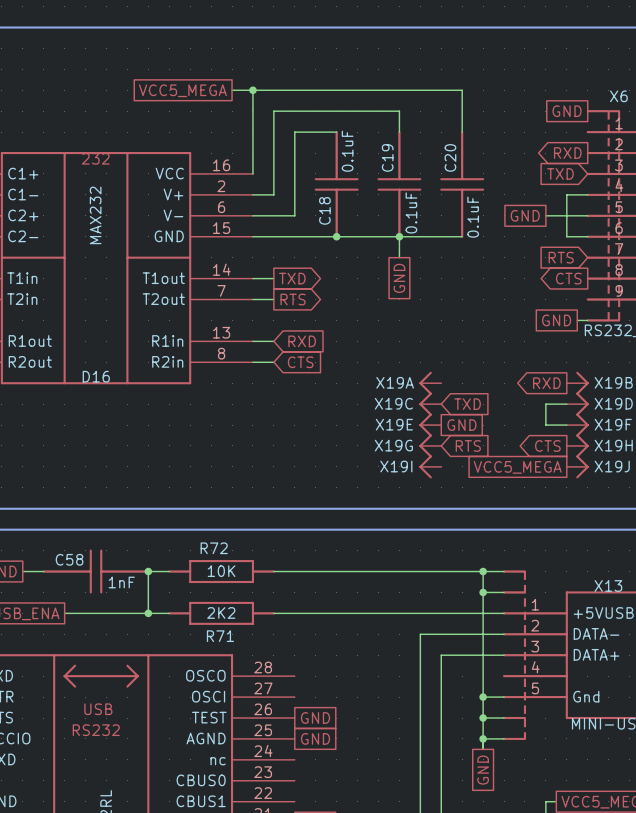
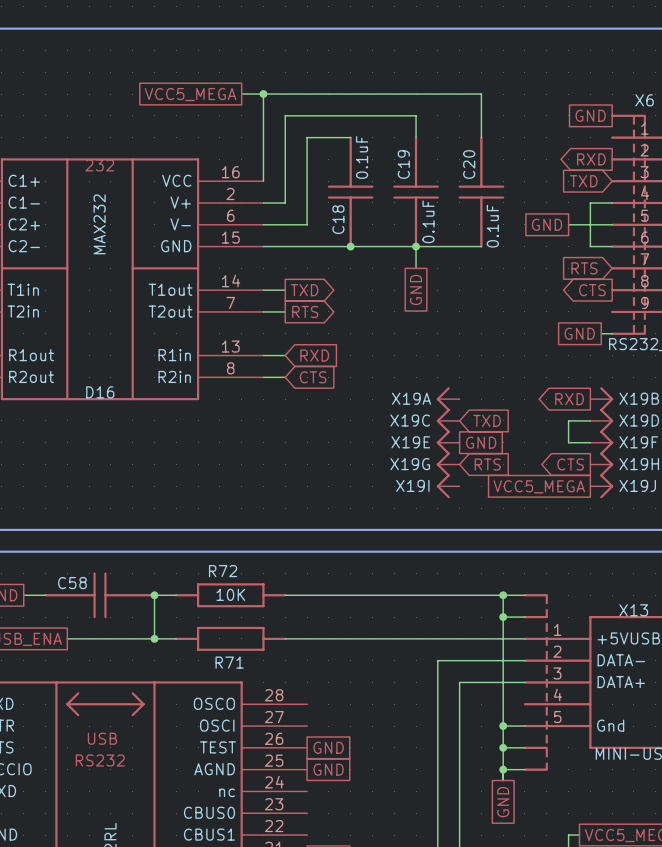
C58 text: 1nF (121, 582) -> none
R71 text: 2K2 (221, 612) -> none

